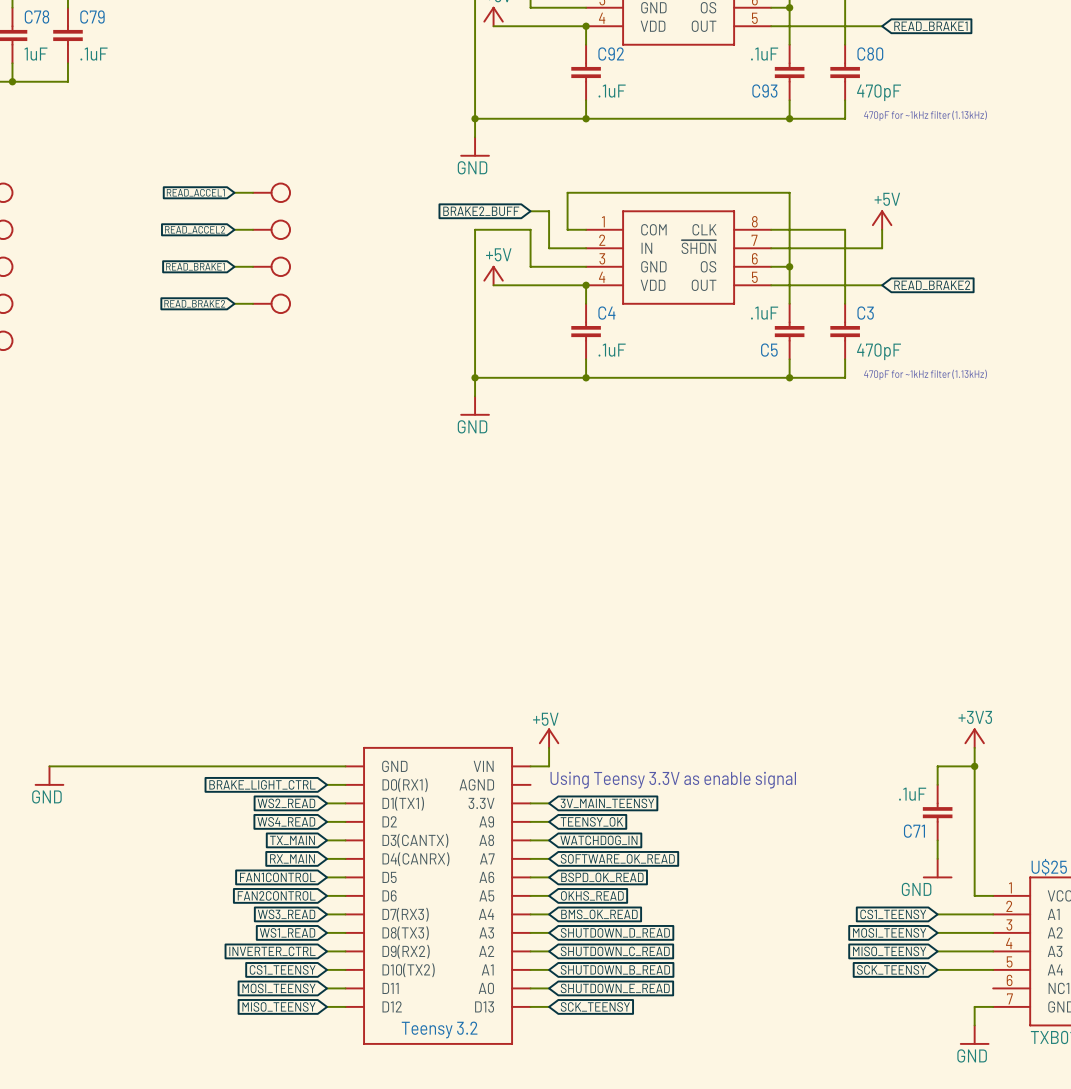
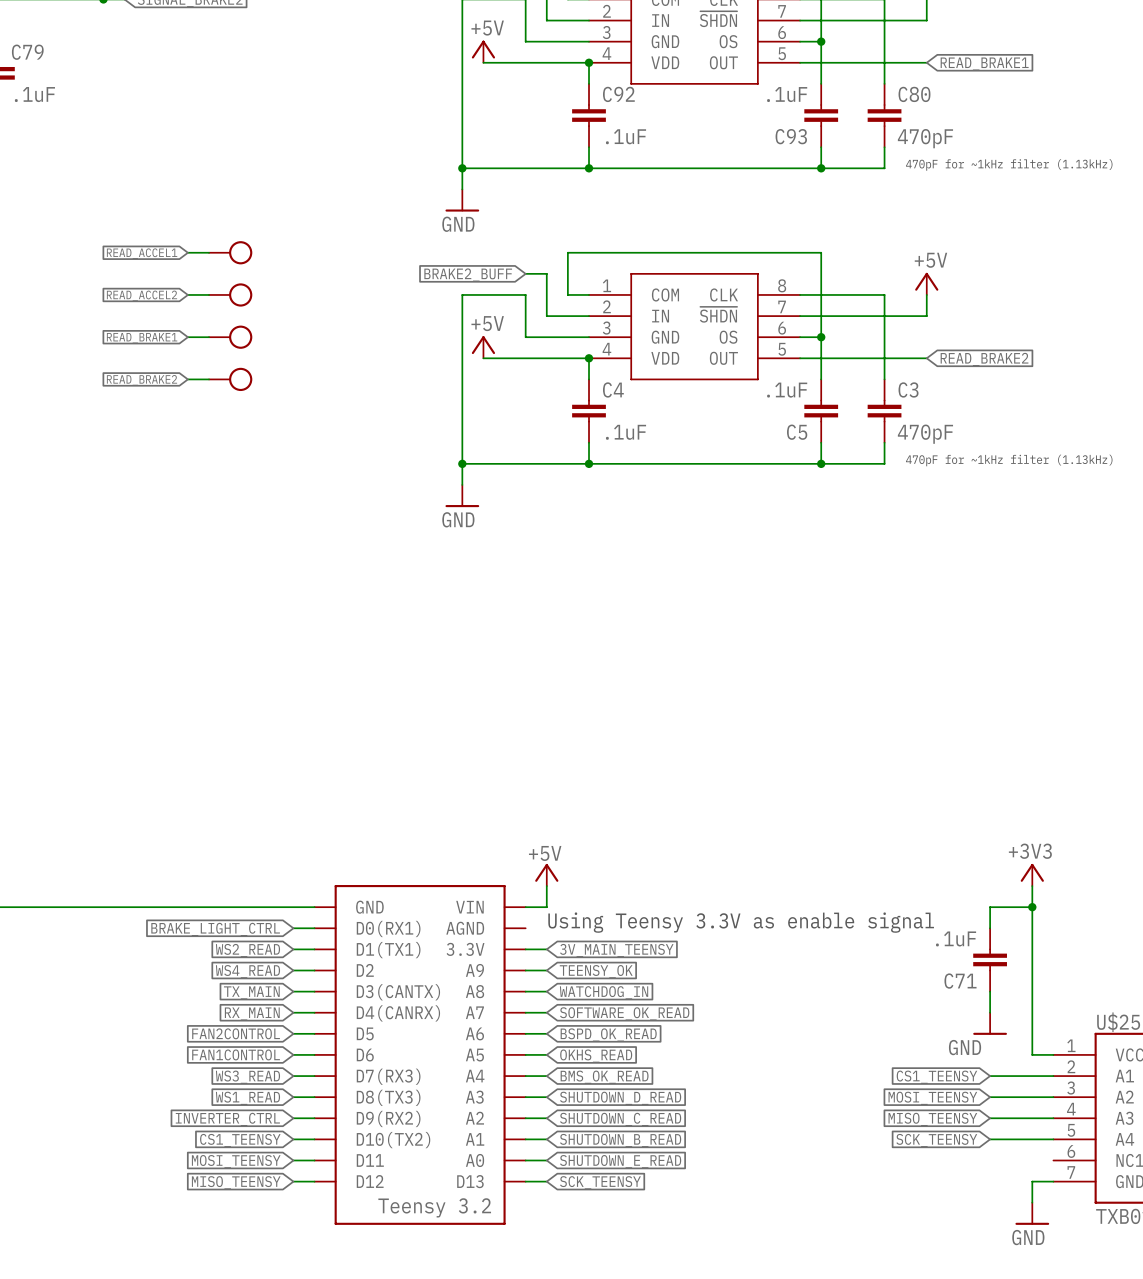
global label: FAN1CONTROL (277, 877) -> FAN2CONTROL (236, 1033)
global label: FAN2CONTROL (276, 895) -> FAN1CONTROL (236, 1054)

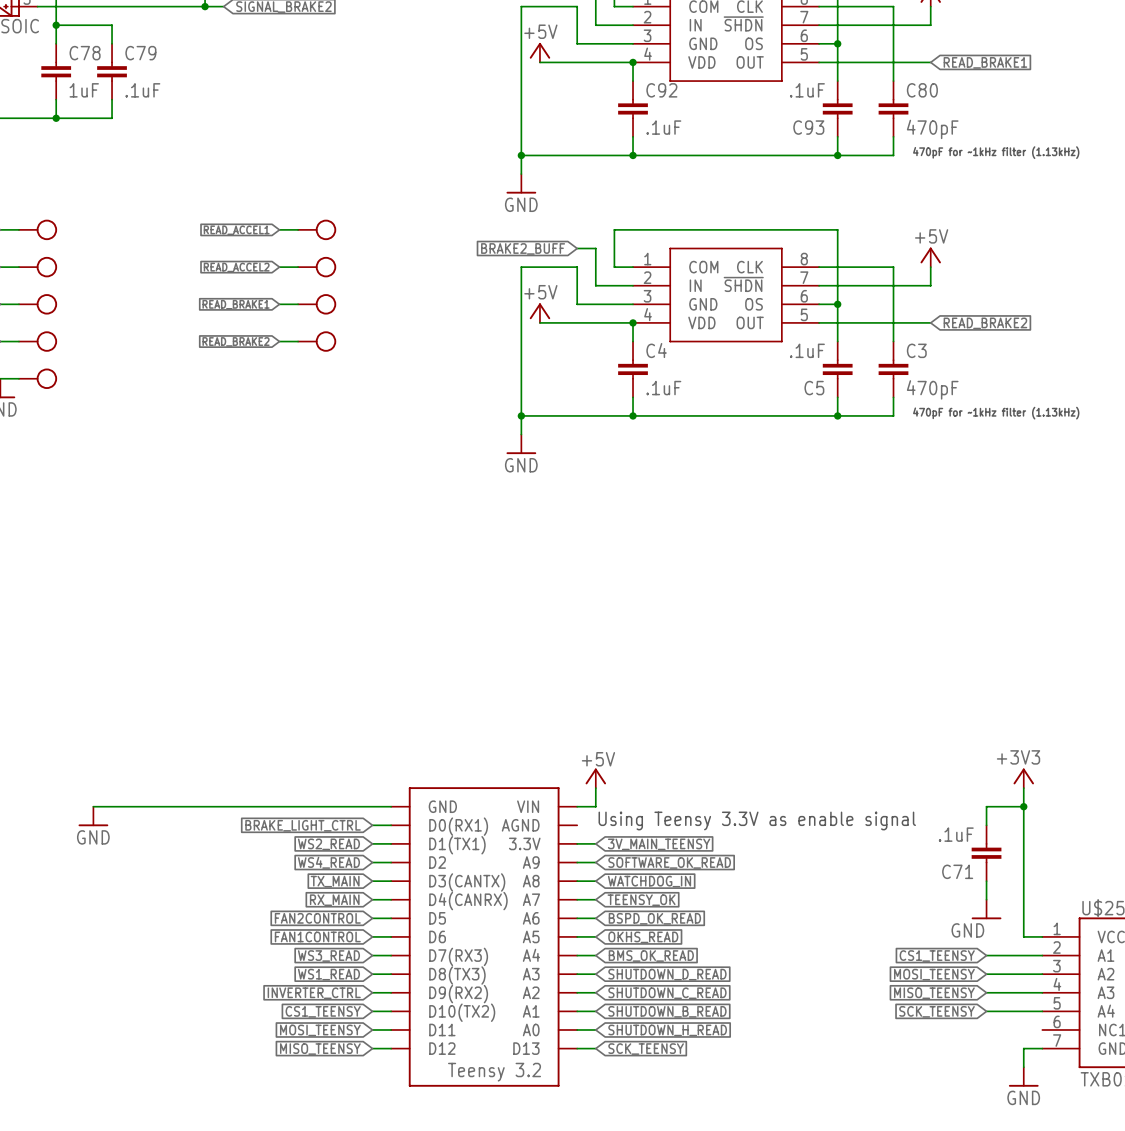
global label: TEENSY_OK (596, 971) -> SOFTWARE_OK_READ (669, 862)
global label: SOFTWARE_OK_READ (624, 1013) -> TEENSY_OK (641, 900)
global label: SHUTDOWN_E_READ (620, 1161) -> SHUTDOWN_H_READ (667, 1030)

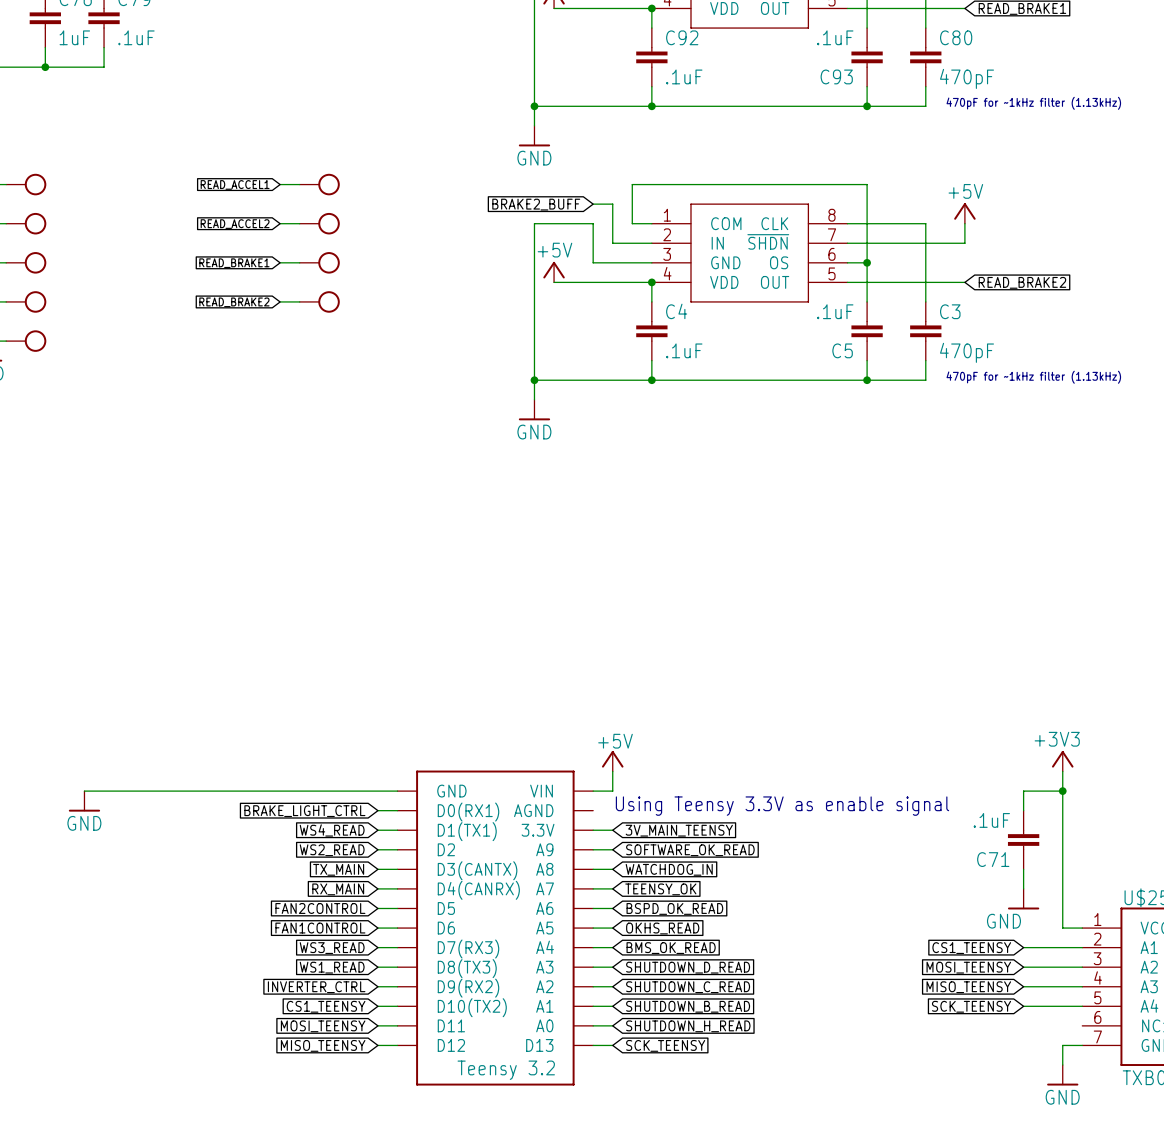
global label: WS2_READ (328, 844) -> WS4_READ (332, 830)
global label: WS4_READ (328, 862) -> WS2_READ (332, 850)

